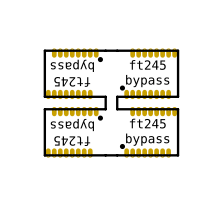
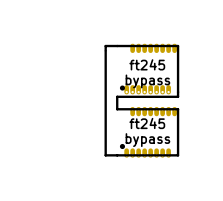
part: none -> (132, 48)
part: none -> (138, 48)
part: none -> (144, 48)
part: none -> (150, 48)
part: none -> (156, 48)
part: none -> (162, 48)
part: none -> (168, 48)
part: none -> (174, 48)
board edge: (178, 50) (44, 50) (44, 96) (105, 96) -> (178, 50) (178, 46) (105, 46) (105, 96)
part: (54, 53) -> none
part: (60, 53) -> none
part: (66, 53) -> none
part: (72, 53) -> none
part: (78, 53) -> none
part: (84, 53) -> none
part: (90, 53) -> none
part: (96, 53) -> none
part: (132, 53) -> none
part: (138, 53) -> none
part: (144, 53) -> none
part: (150, 53) -> none
part: (156, 53) -> none
part: (162, 53) -> none
part: (168, 53) -> none
part: (174, 53) -> none
drawing: [97, 57, 103, 63] -> none
text: bypass (72, 65) -> none
text: ft245 (72, 81) -> none
part: none -> (126, 89)
part: none -> (132, 89)
part: none -> (138, 89)
part: none -> (144, 89)
part: none -> (150, 89)
part: none -> (156, 89)
part: none -> (162, 89)
part: none -> (168, 89)
part: (48, 94) -> none
part: (54, 94) -> none
part: (60, 94) -> none
part: (66, 94) -> none
part: (72, 94) -> none
part: (78, 94) -> none
part: (84, 94) -> none
part: (90, 94) -> none
part: (126, 94) -> none
part: (132, 94) -> none
part: (138, 94) -> none
part: (144, 94) -> none
part: (150, 94) -> none
part: (156, 94) -> none
part: (162, 94) -> none
part: (168, 94) -> none
board edge: (105, 109) (44, 109) (44, 155) (105, 155) -> (105, 109) (105, 155)
part: (54, 111) -> none
part: (60, 111) -> none
part: (66, 111) -> none
part: (72, 111) -> none
part: (78, 111) -> none
part: (84, 111) -> none
part: (90, 111) -> none
part: (96, 111) -> none
drawing: [97, 115, 103, 121] -> none
text: bypass (72, 125) -> none
text: ft245 (72, 141) -> none
part: (48, 153) -> none
part: (54, 153) -> none
part: (60, 153) -> none
part: (66, 153) -> none
part: (72, 153) -> none
part: (78, 153) -> none
part: (84, 153) -> none
part: (90, 153) -> none

